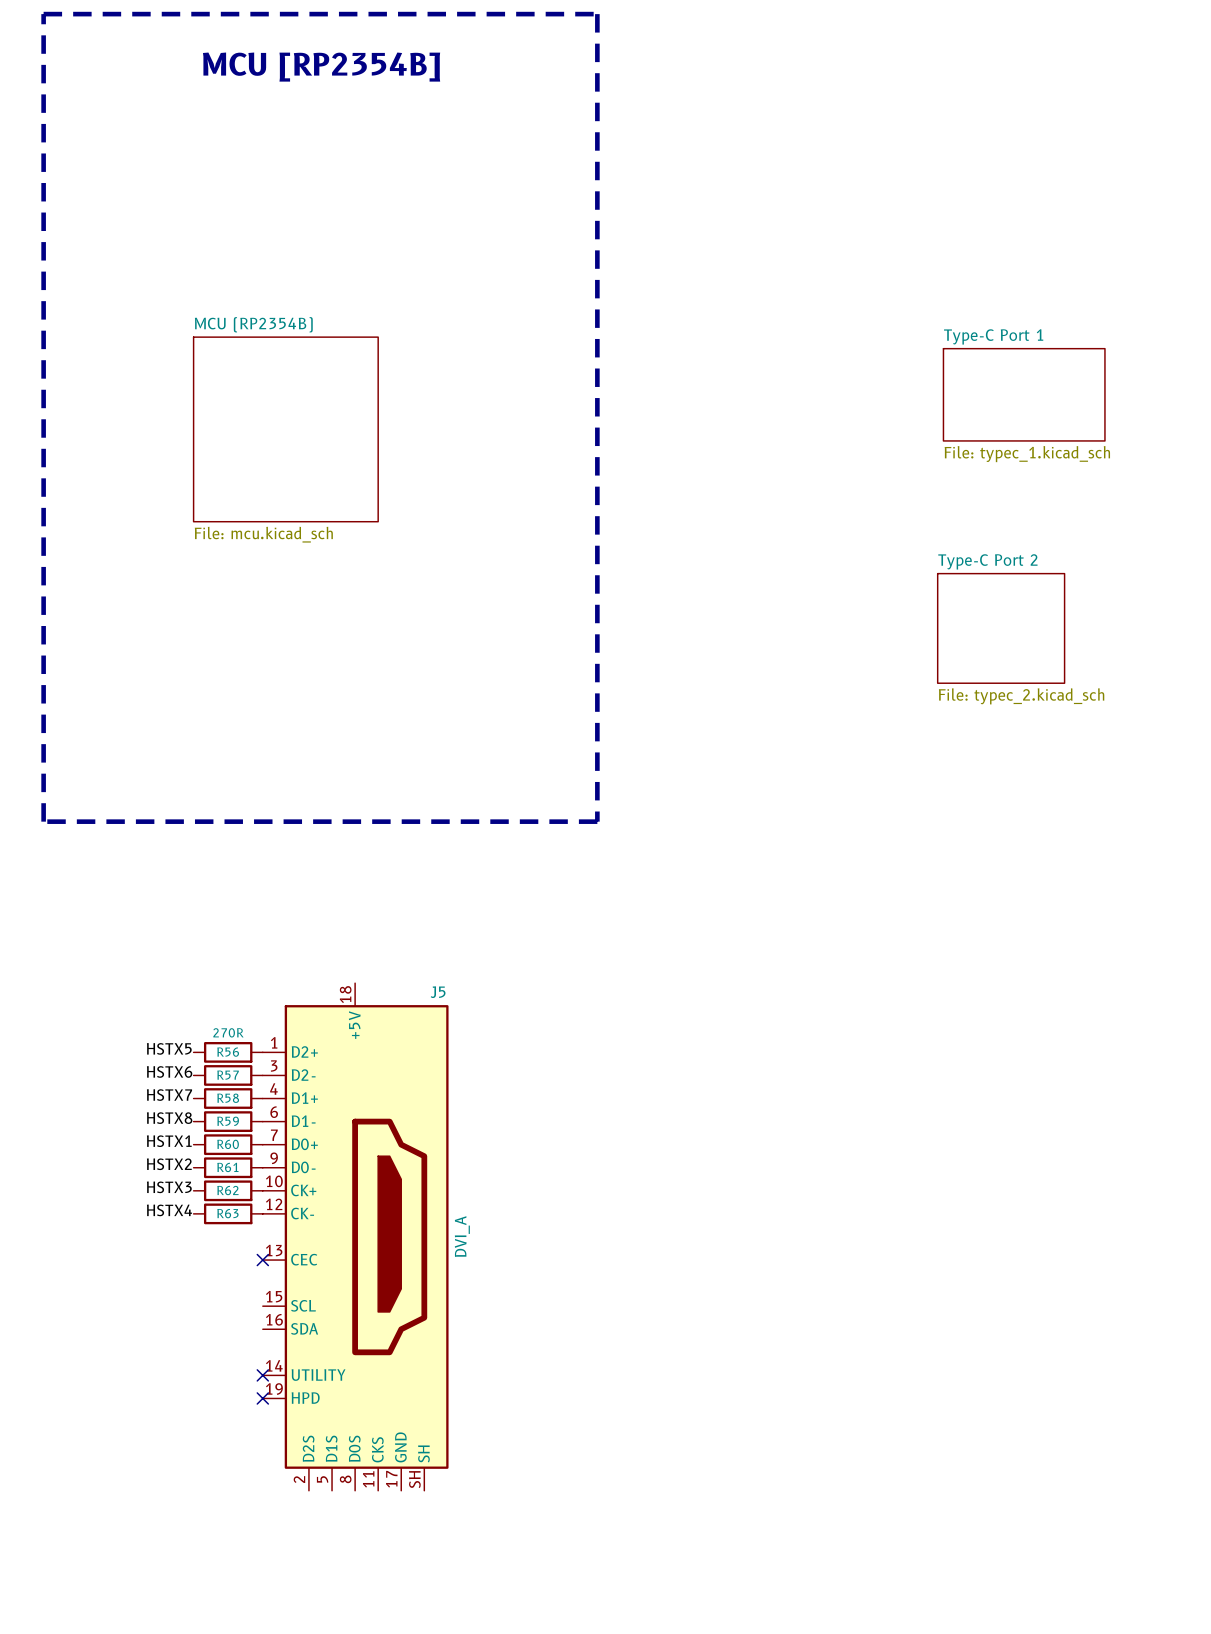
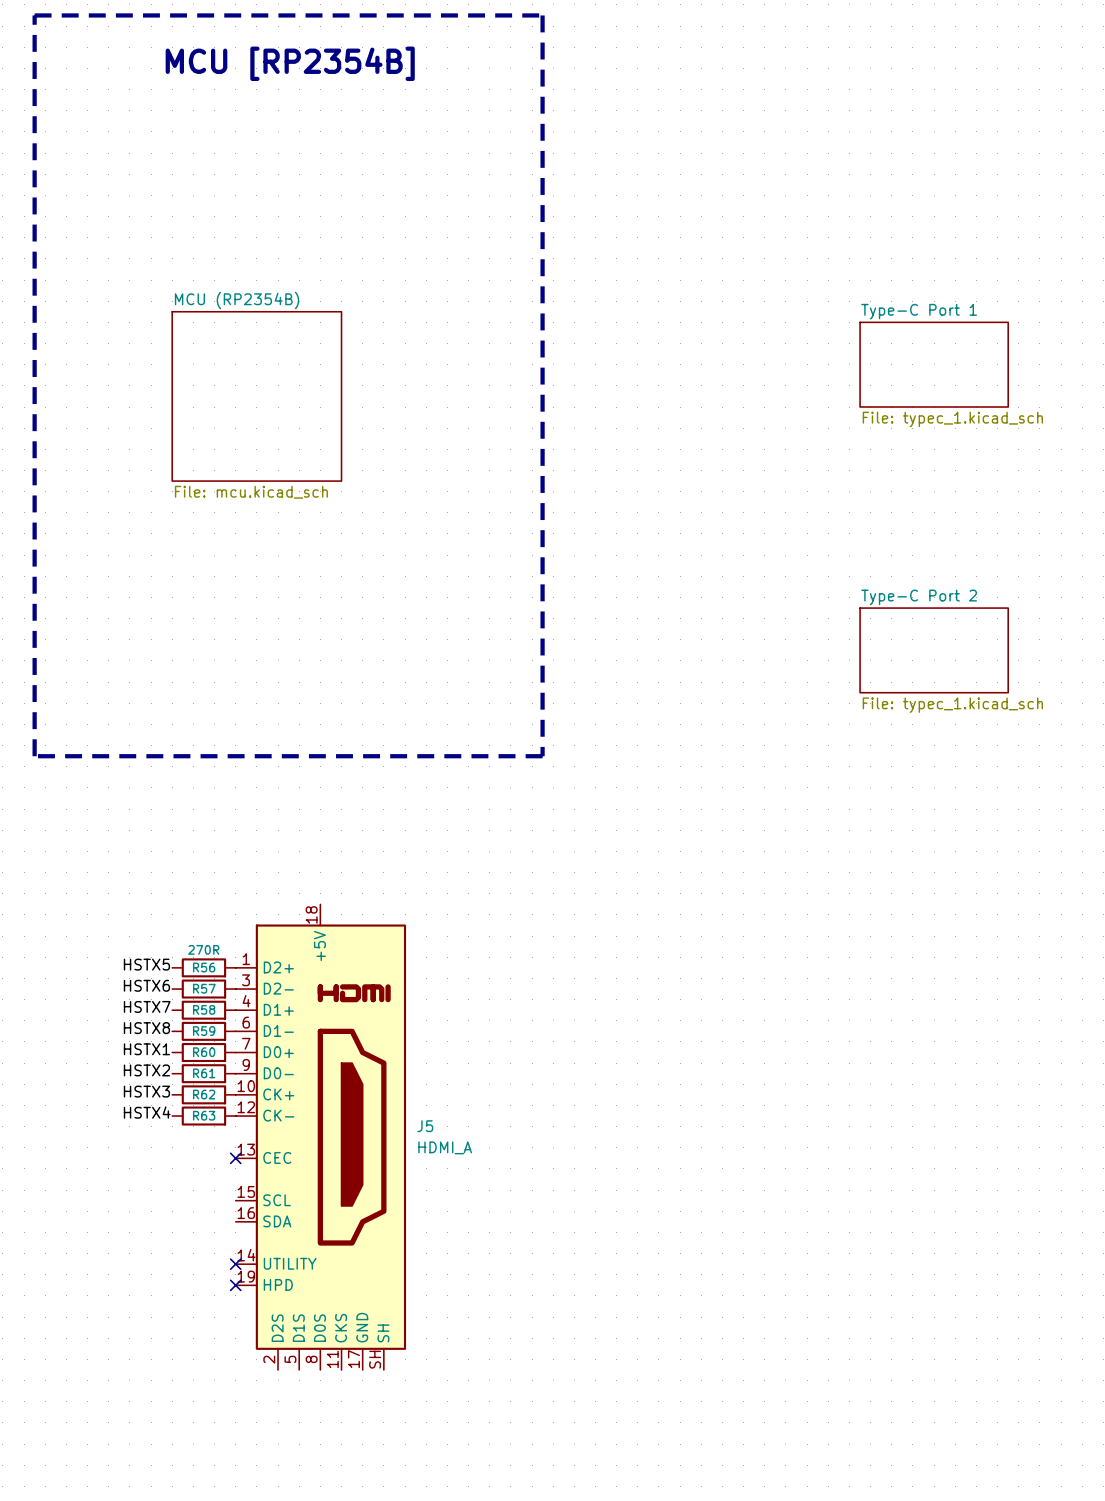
sheet Type-C Port 2 name position: Type-C Port 2 (987, 561) -> Type-C Port 2 (919, 597)
sheet Type-C Port 2 shape: [936, 572, 1066, 684] -> [859, 607, 1009, 694]
sheet Type-C Port 2 value: File: typec_2.kicad_sch (1021, 696) -> File: typec_1.kicad_sch (952, 705)
J5 symbol: [262, 983, 449, 1491] -> [235, 904, 407, 1370]
J5 name position: J5 (438, 992) -> J5 (425, 1126)
J5 value: DVI_A (462, 1236) -> HDMI_A (445, 1147)

